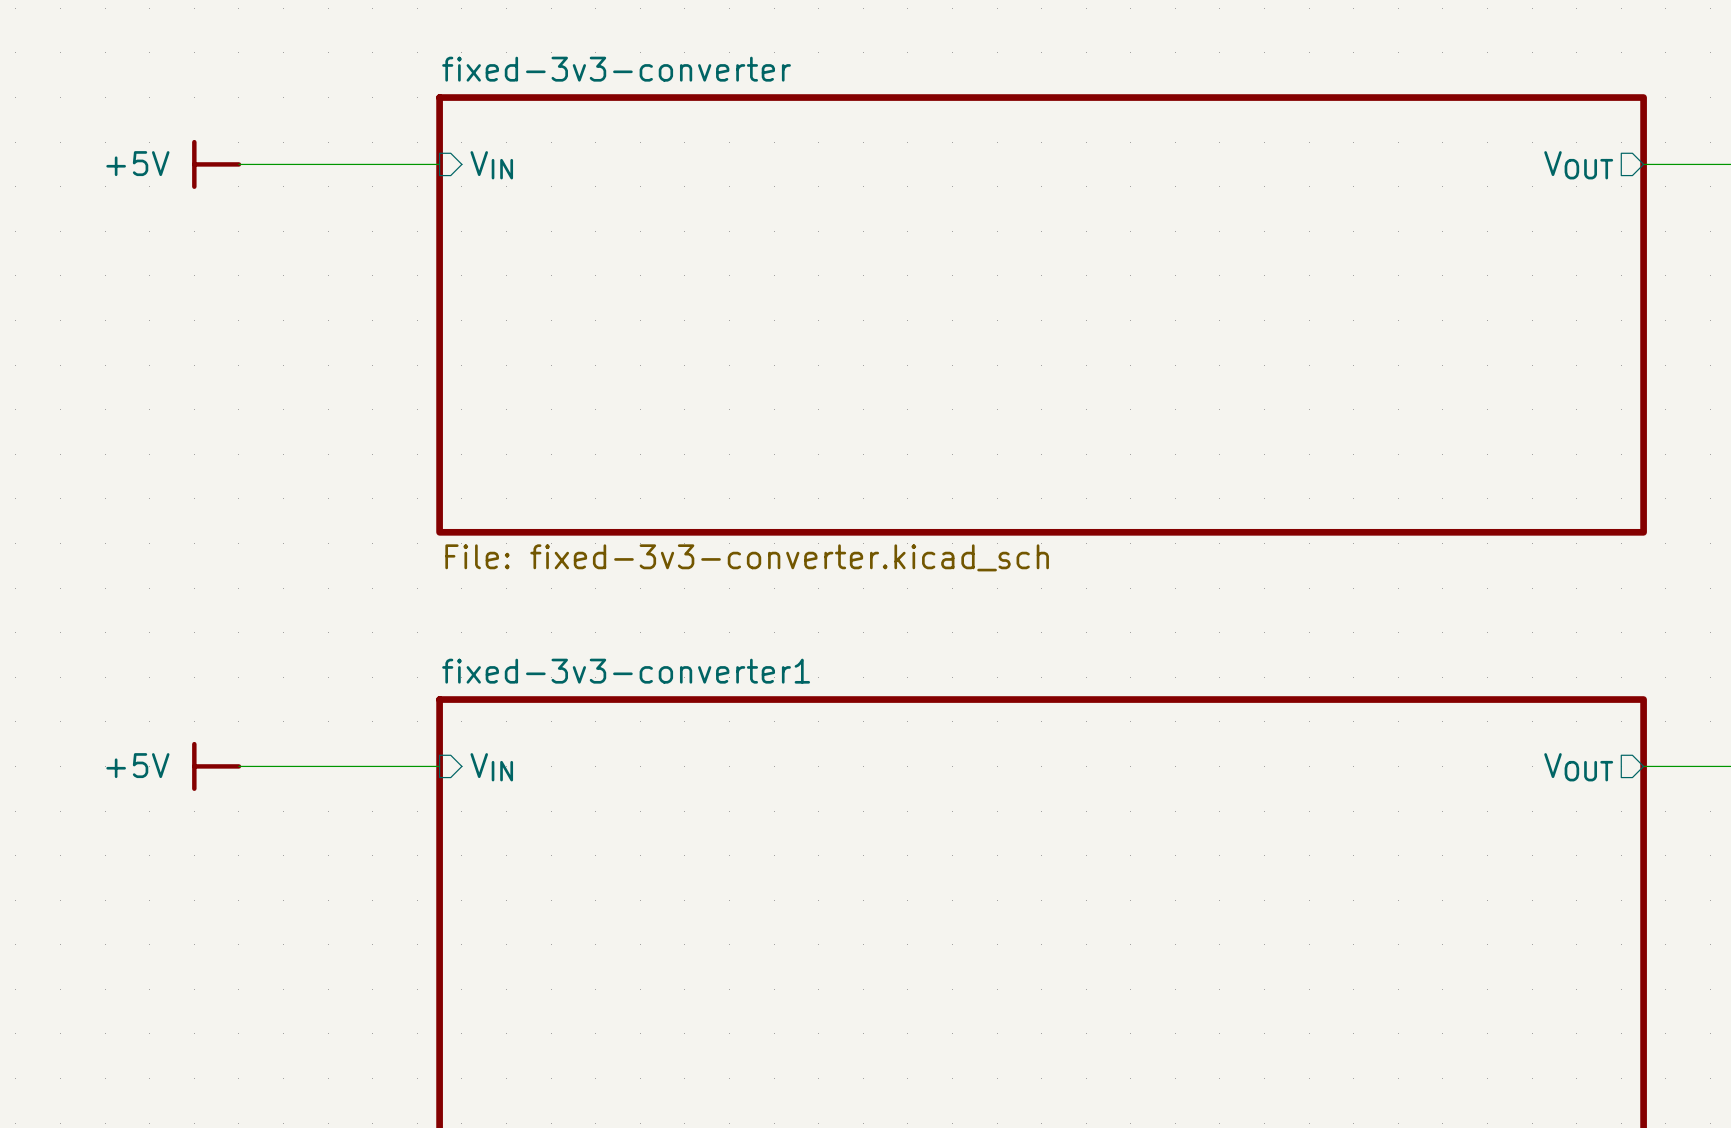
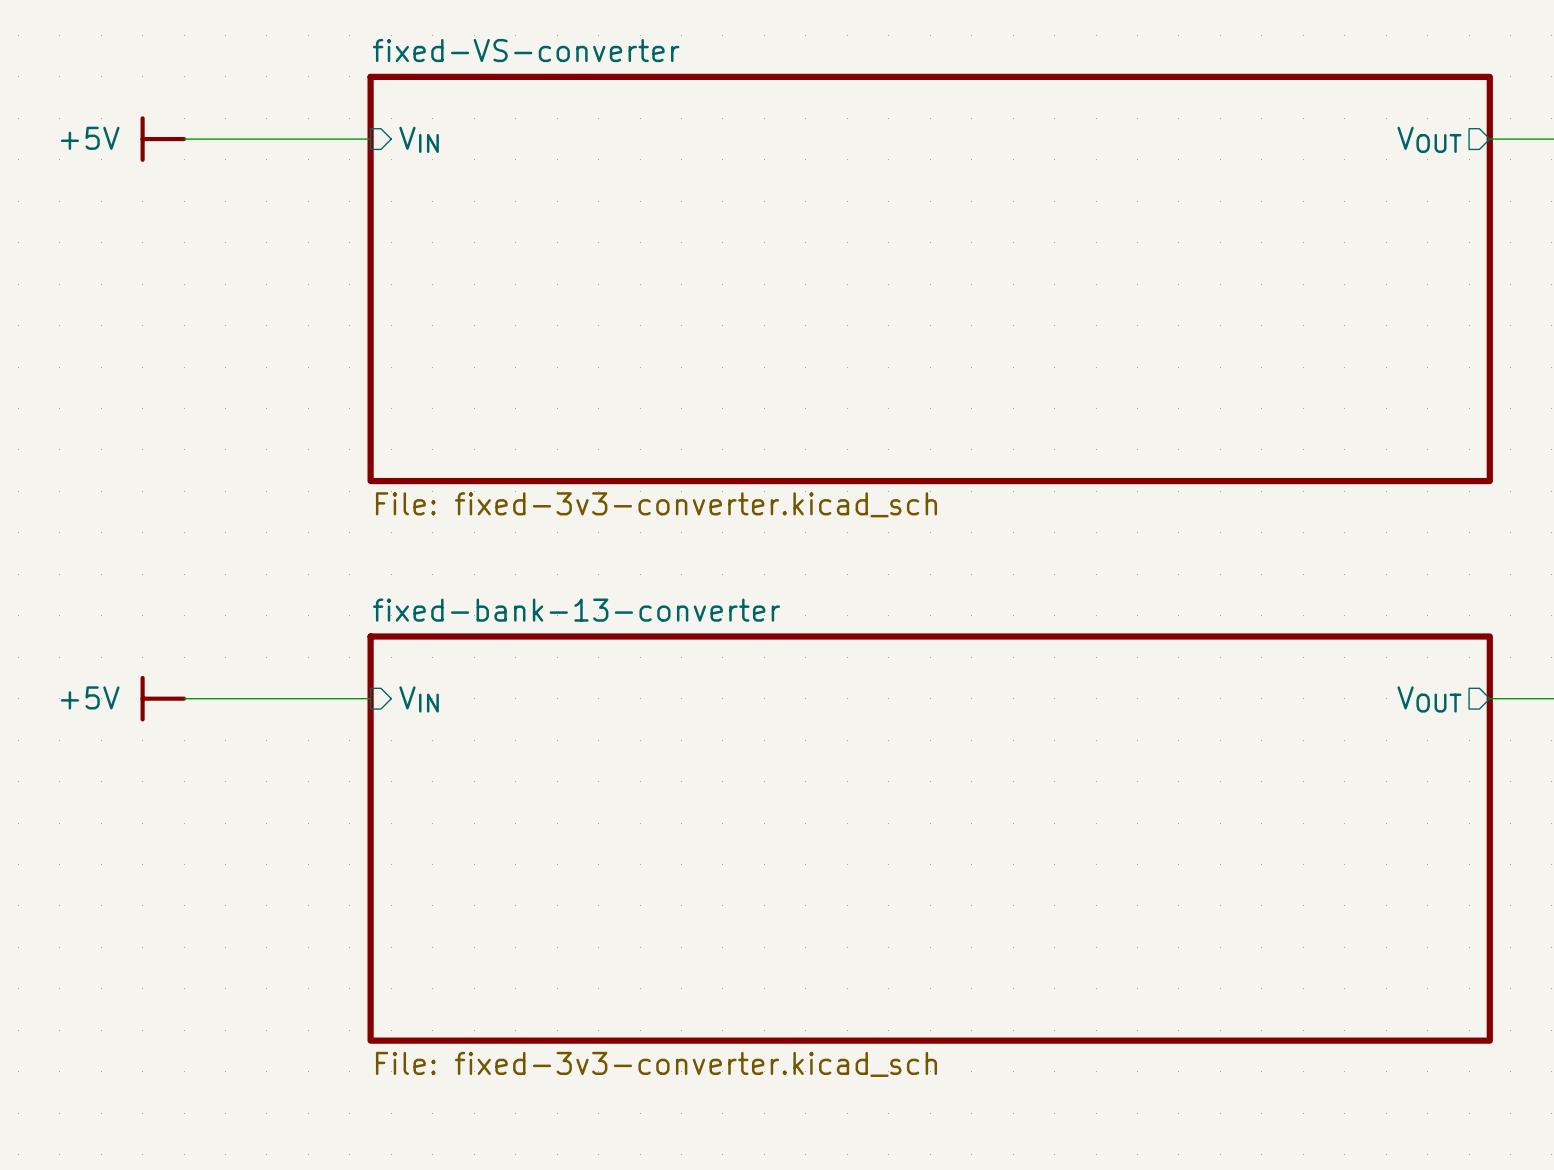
sheet fixed-3v3-converter name: fixed-3v3-converter (616, 69) -> fixed-VS-converter (526, 50)
sheet fixed-3v3-converter1 name: fixed-3v3-converter1 (626, 671) -> fixed-bank-13-converter (576, 610)

